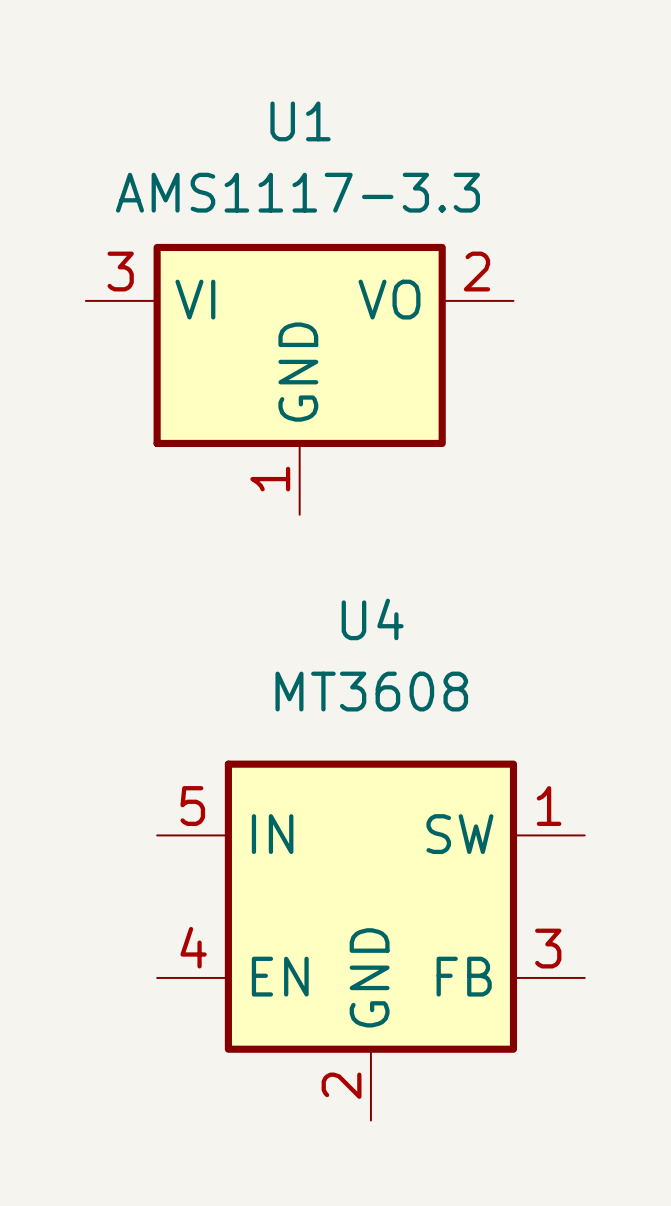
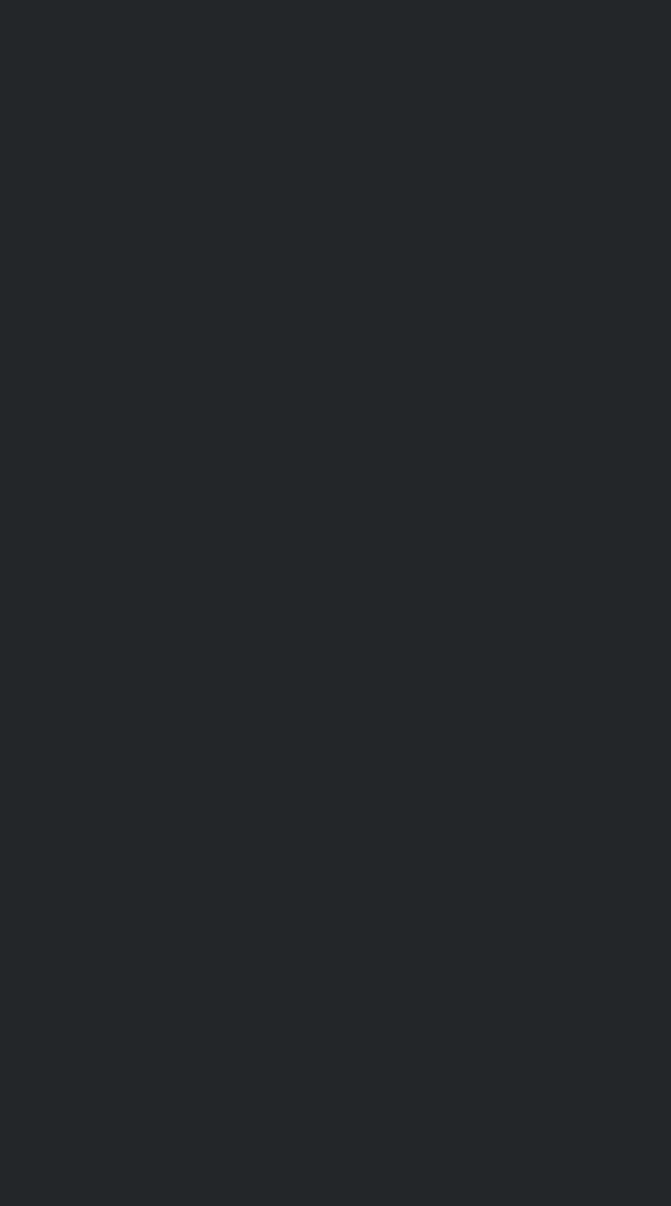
U1: AMS1117-3.3 (299, 379) -> none
U4: MT3608 (370, 940) -> none

